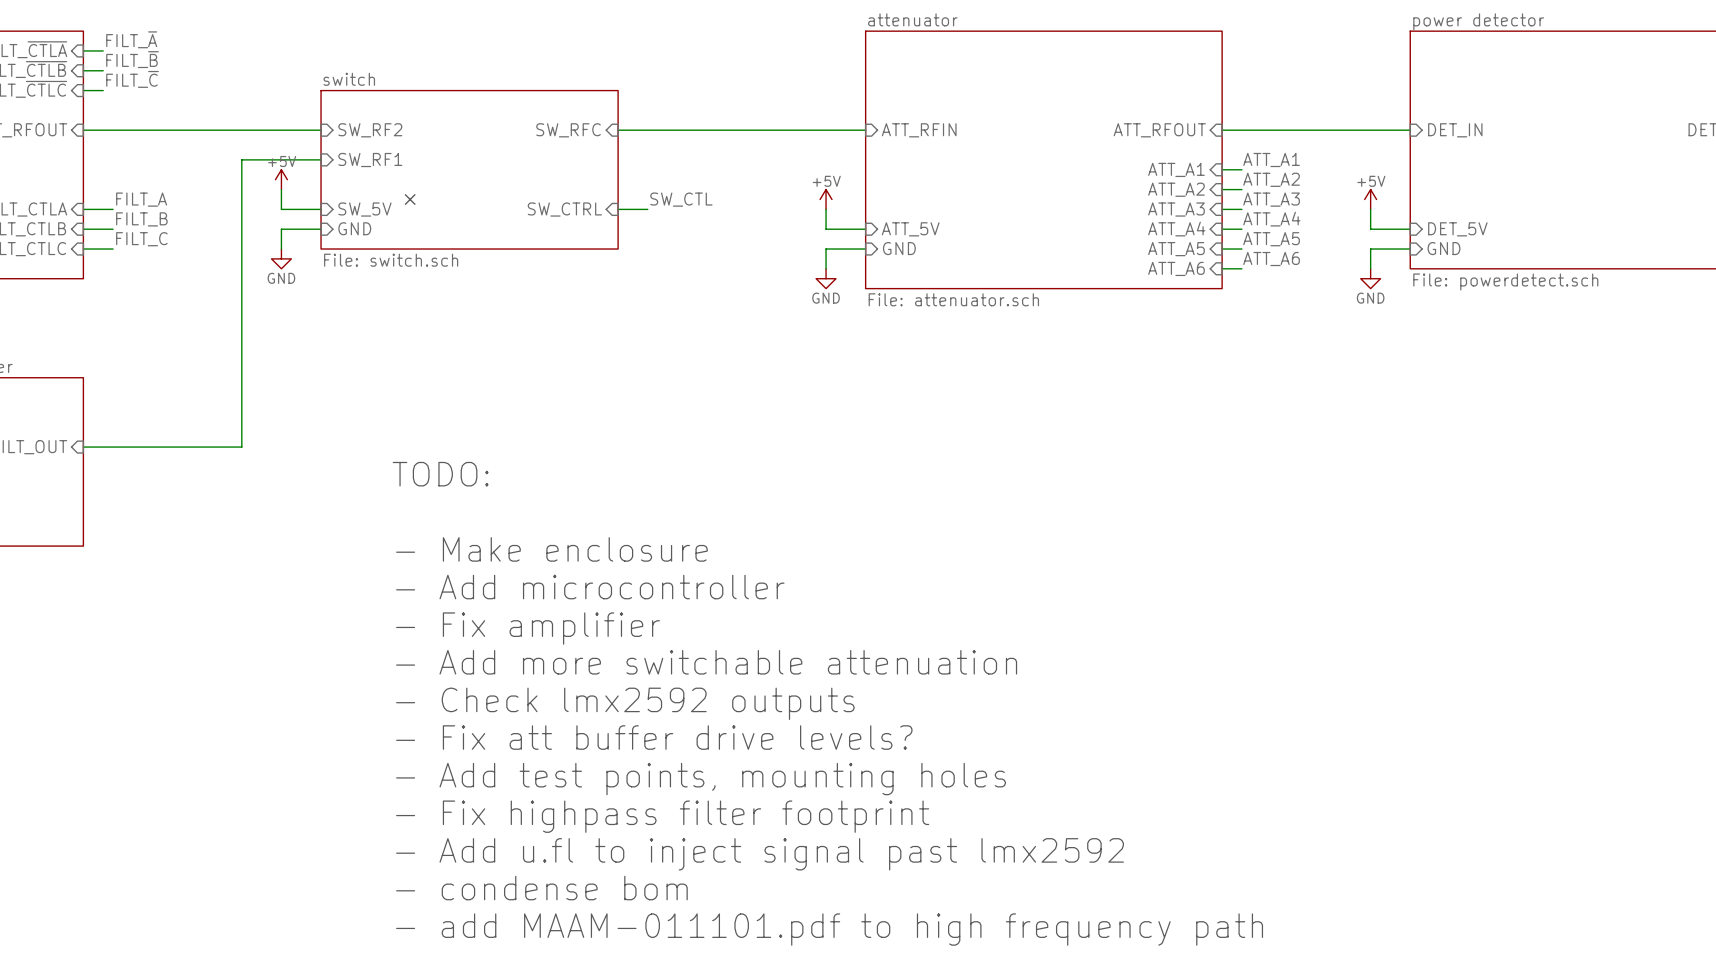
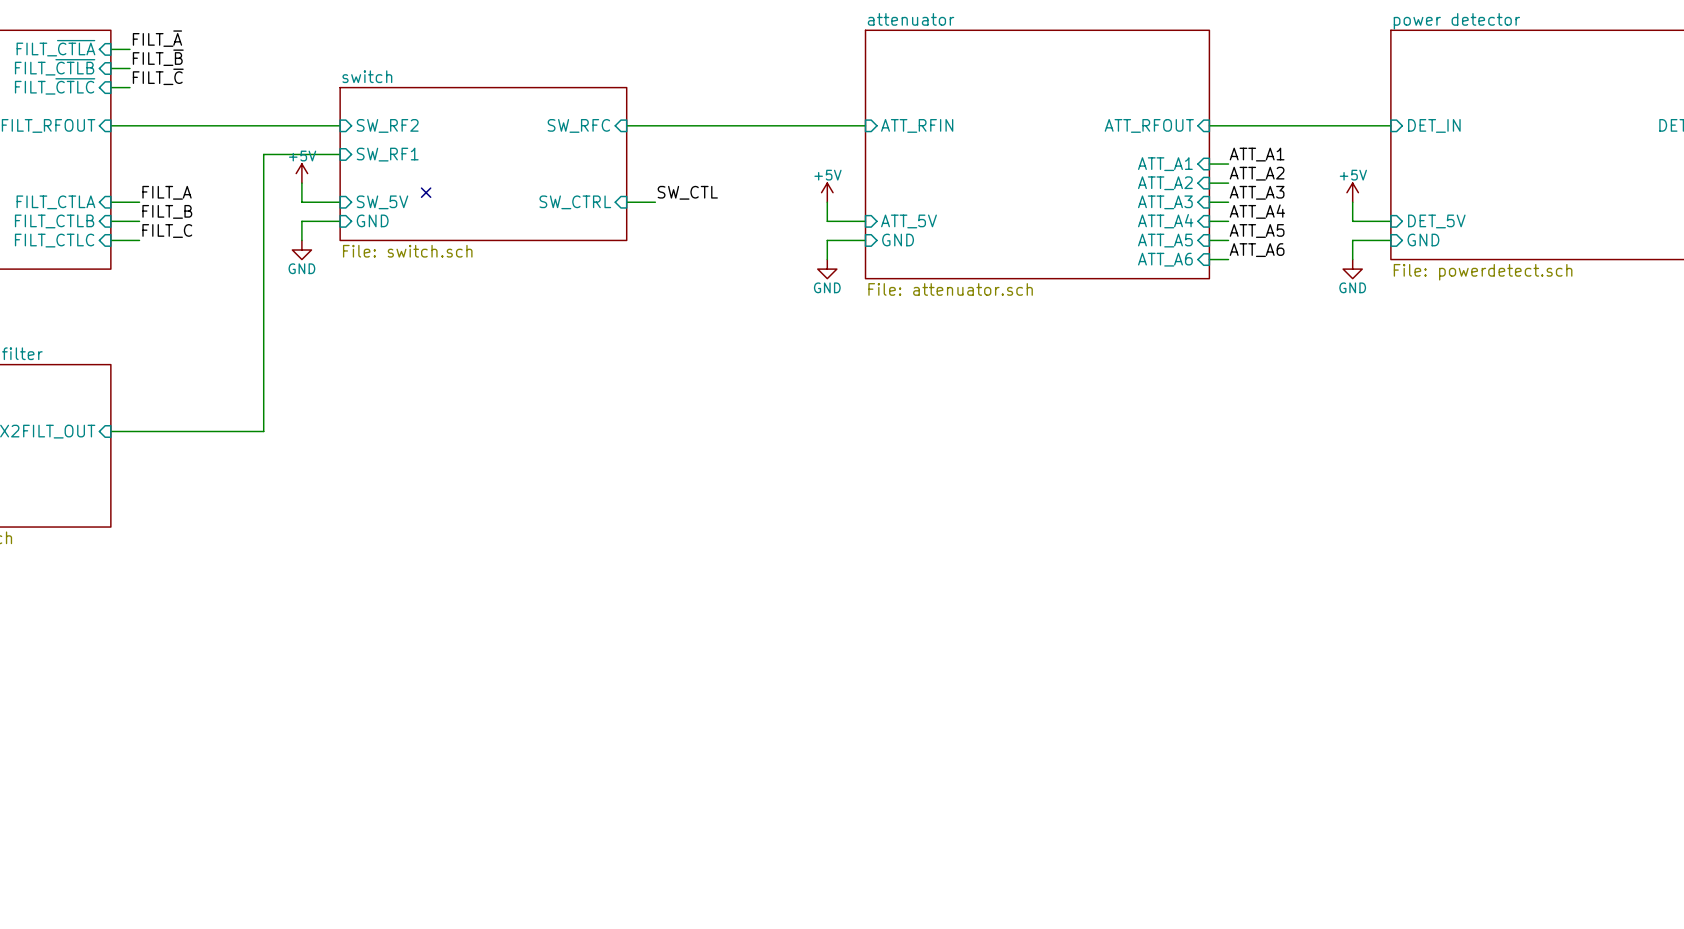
text: TODO: (440, 474) -> none
text: - Make enclosure (551, 549) -> none
text: - Add microcontroller (590, 587) -> none
text: - Fix amplifier (528, 628) -> none
text: - Add more switchable attenuation (706, 662) -> none
text: - Check lmx2592 outputs (625, 703) -> none
text: - Fix att buffer drive levels? (654, 737) -> none
text: - Add test points, mounting holes (701, 779) -> none
text: - Fix highpass filter footprint (662, 816) -> none
text: - Add u.fl to inject signal past lmx2592 (760, 854) -> none
text: - condense bom (541, 888) -> none
text: - add MAAM-011101.pdf to high frequency path (829, 929) -> none

